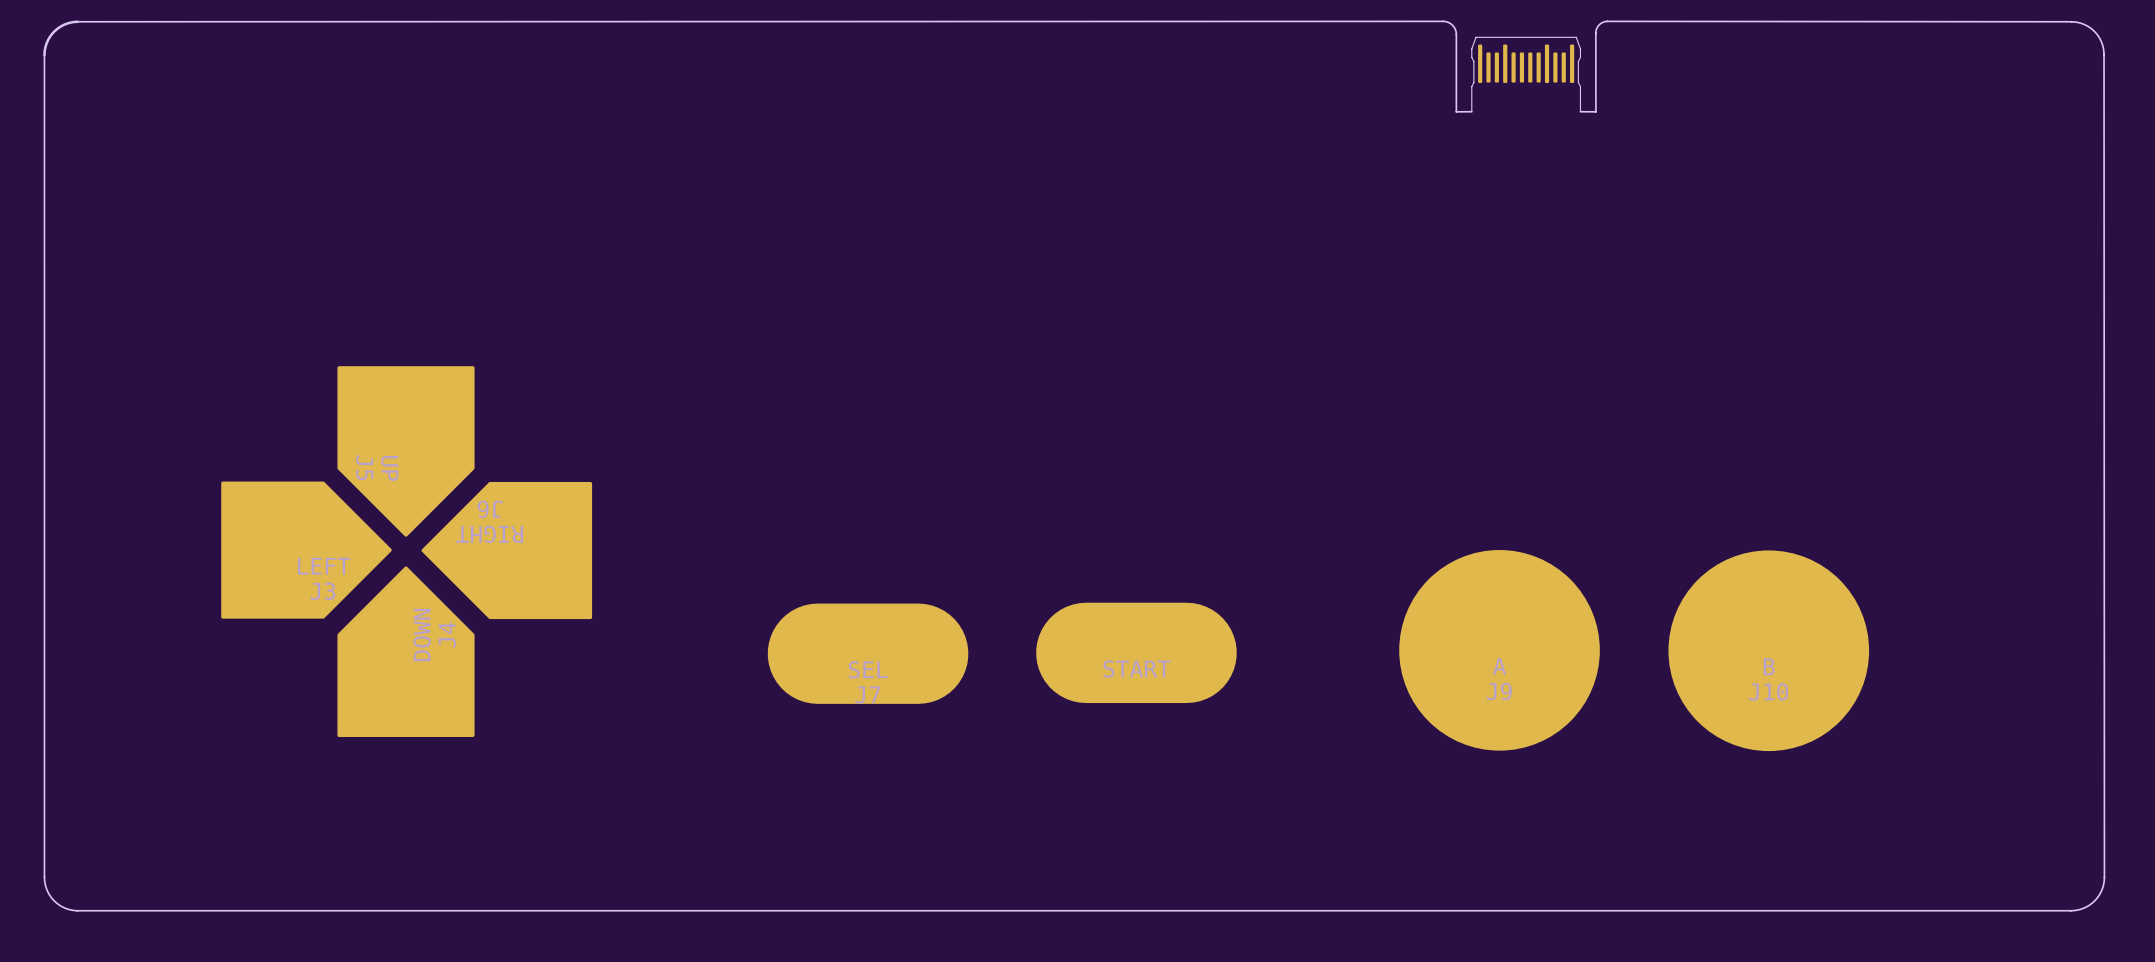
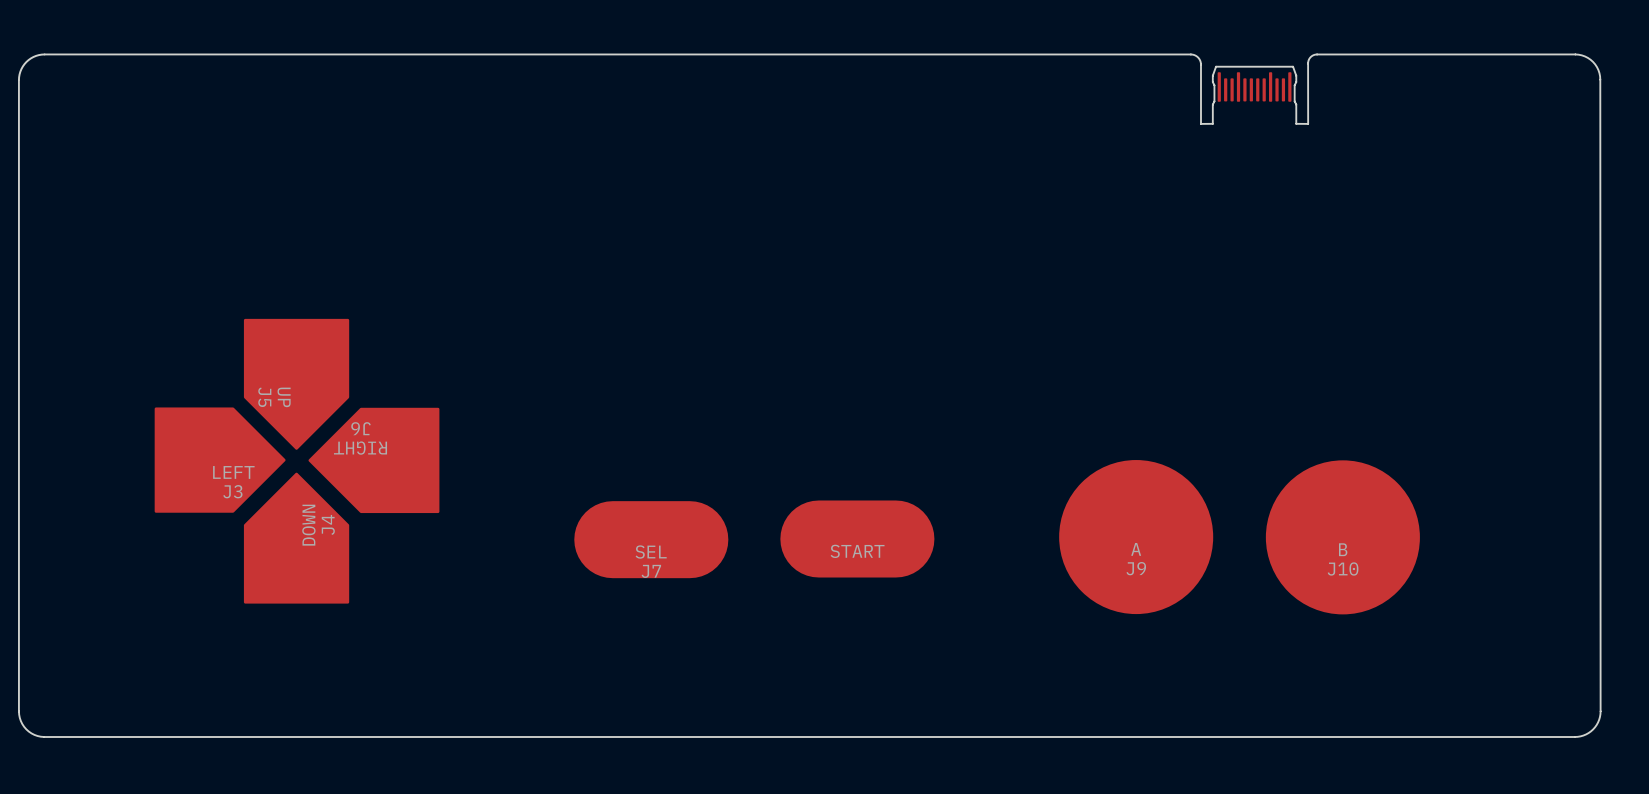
board edge: (77, 21) (1444, 21) (1452, 25) (1456, 33) (1456, 111) (1471, 111) -> (44, 54) (1192, 54) (1198, 57) (1200, 63) (1200, 123) (1212, 123)
board edge: (2071, 21) (1606, 21) (1599, 24) (1595, 31) (1595, 111) (1580, 111) -> (1575, 54) (1315, 54) (1310, 57) (1308, 62) (1308, 123) (1296, 123)
part: (1526, 74) -> none
part: none -> (1254, 95)

